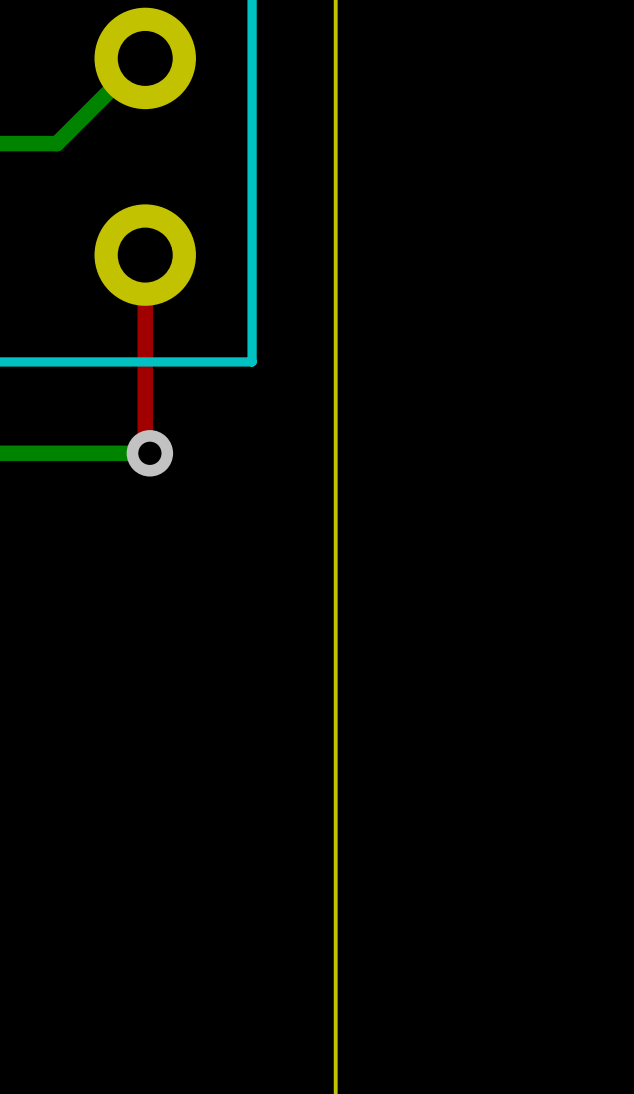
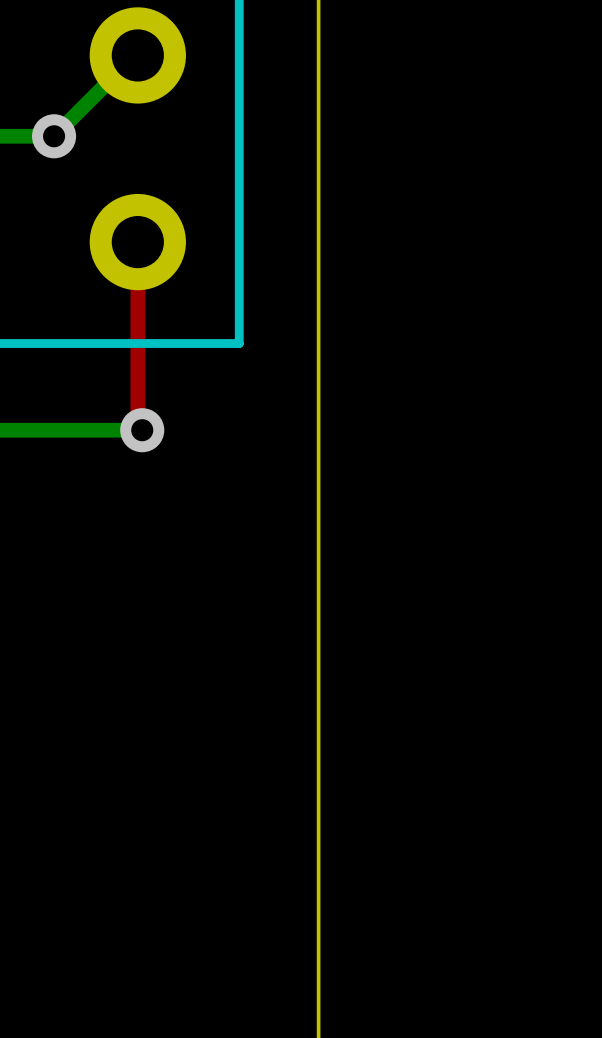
via: none -> (54, 136)

